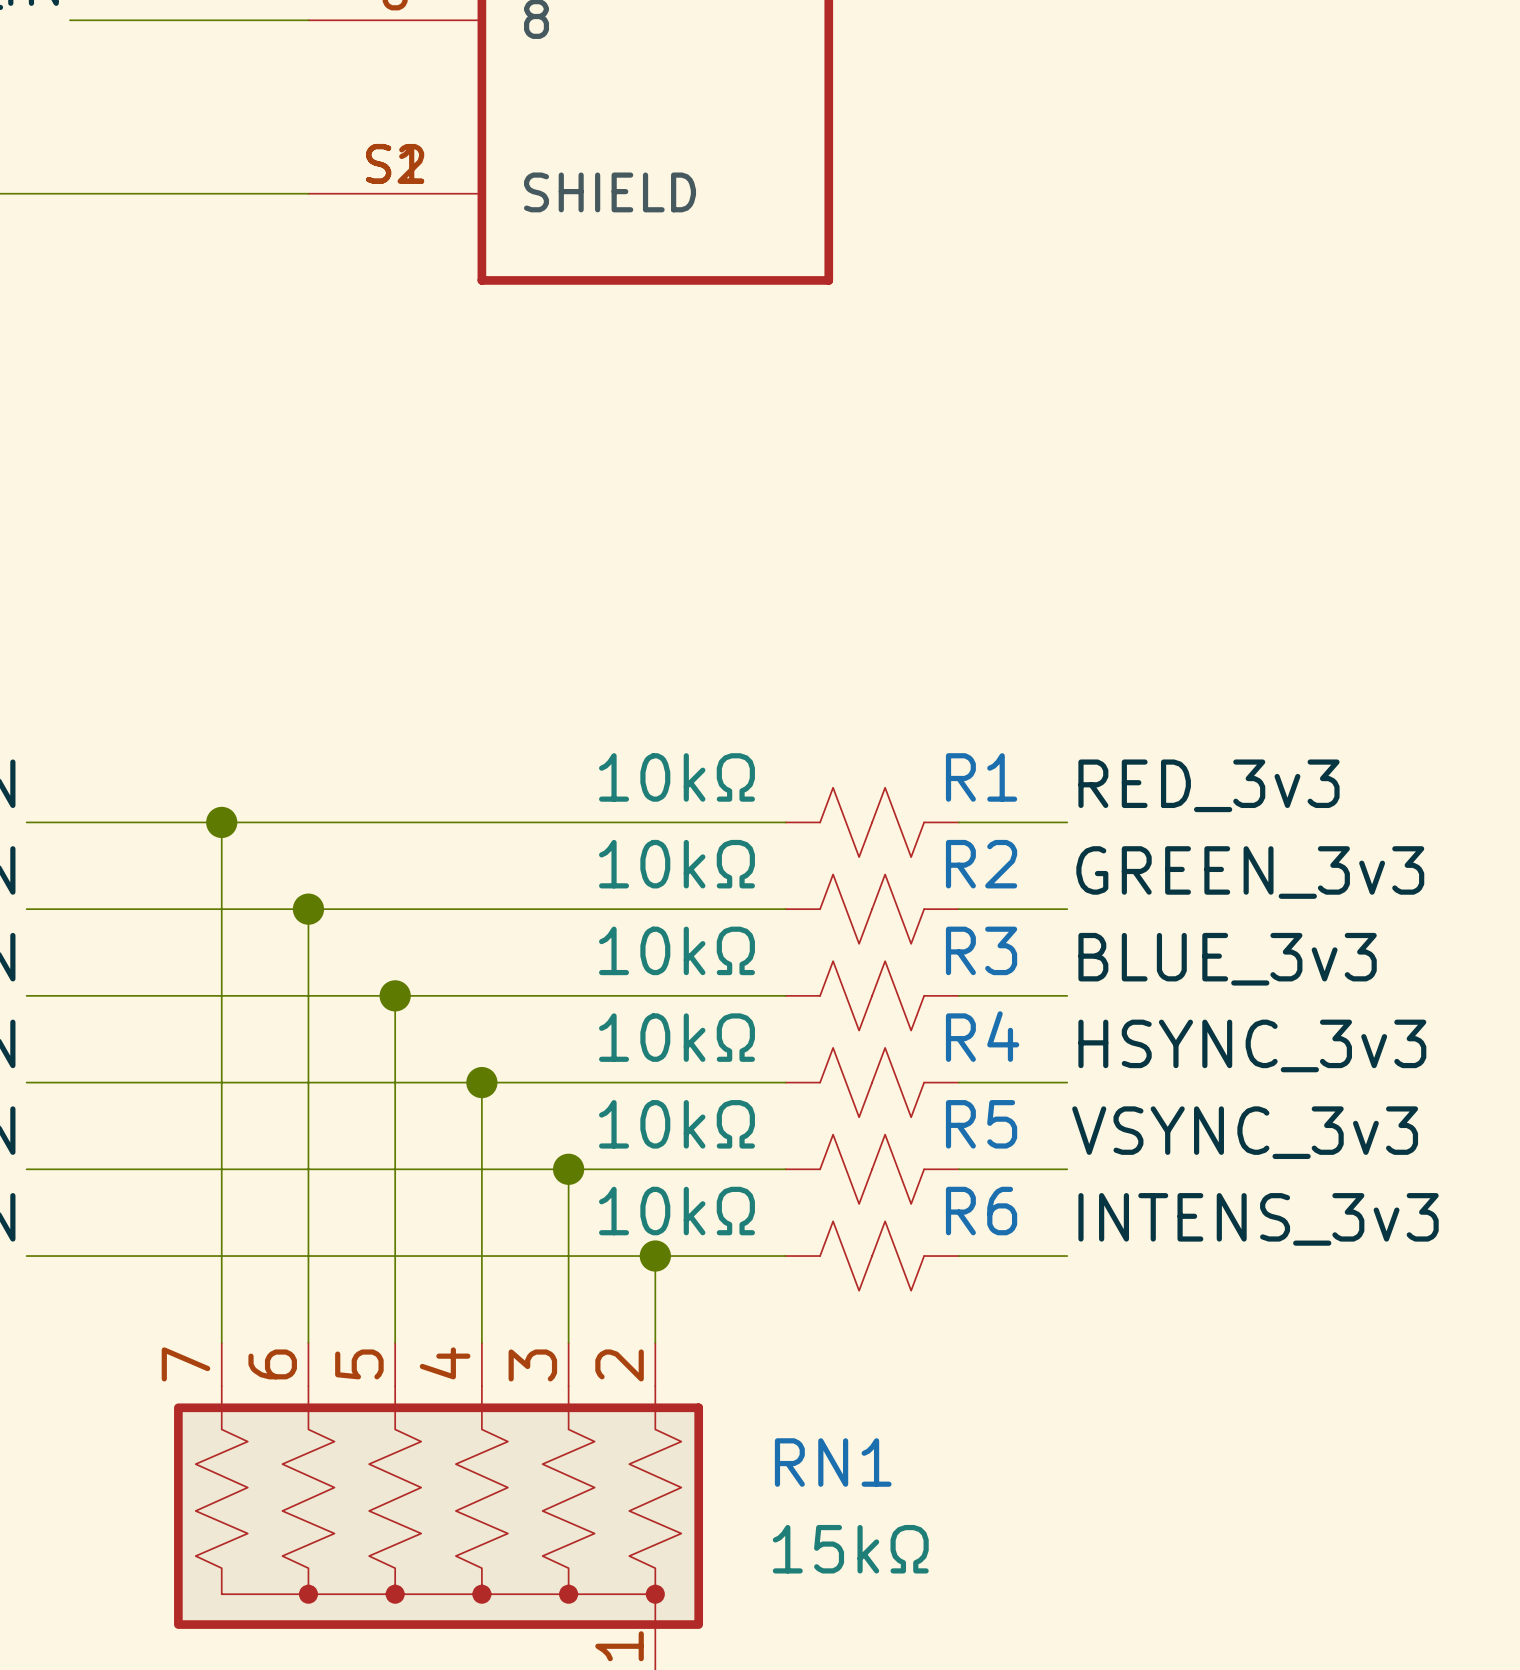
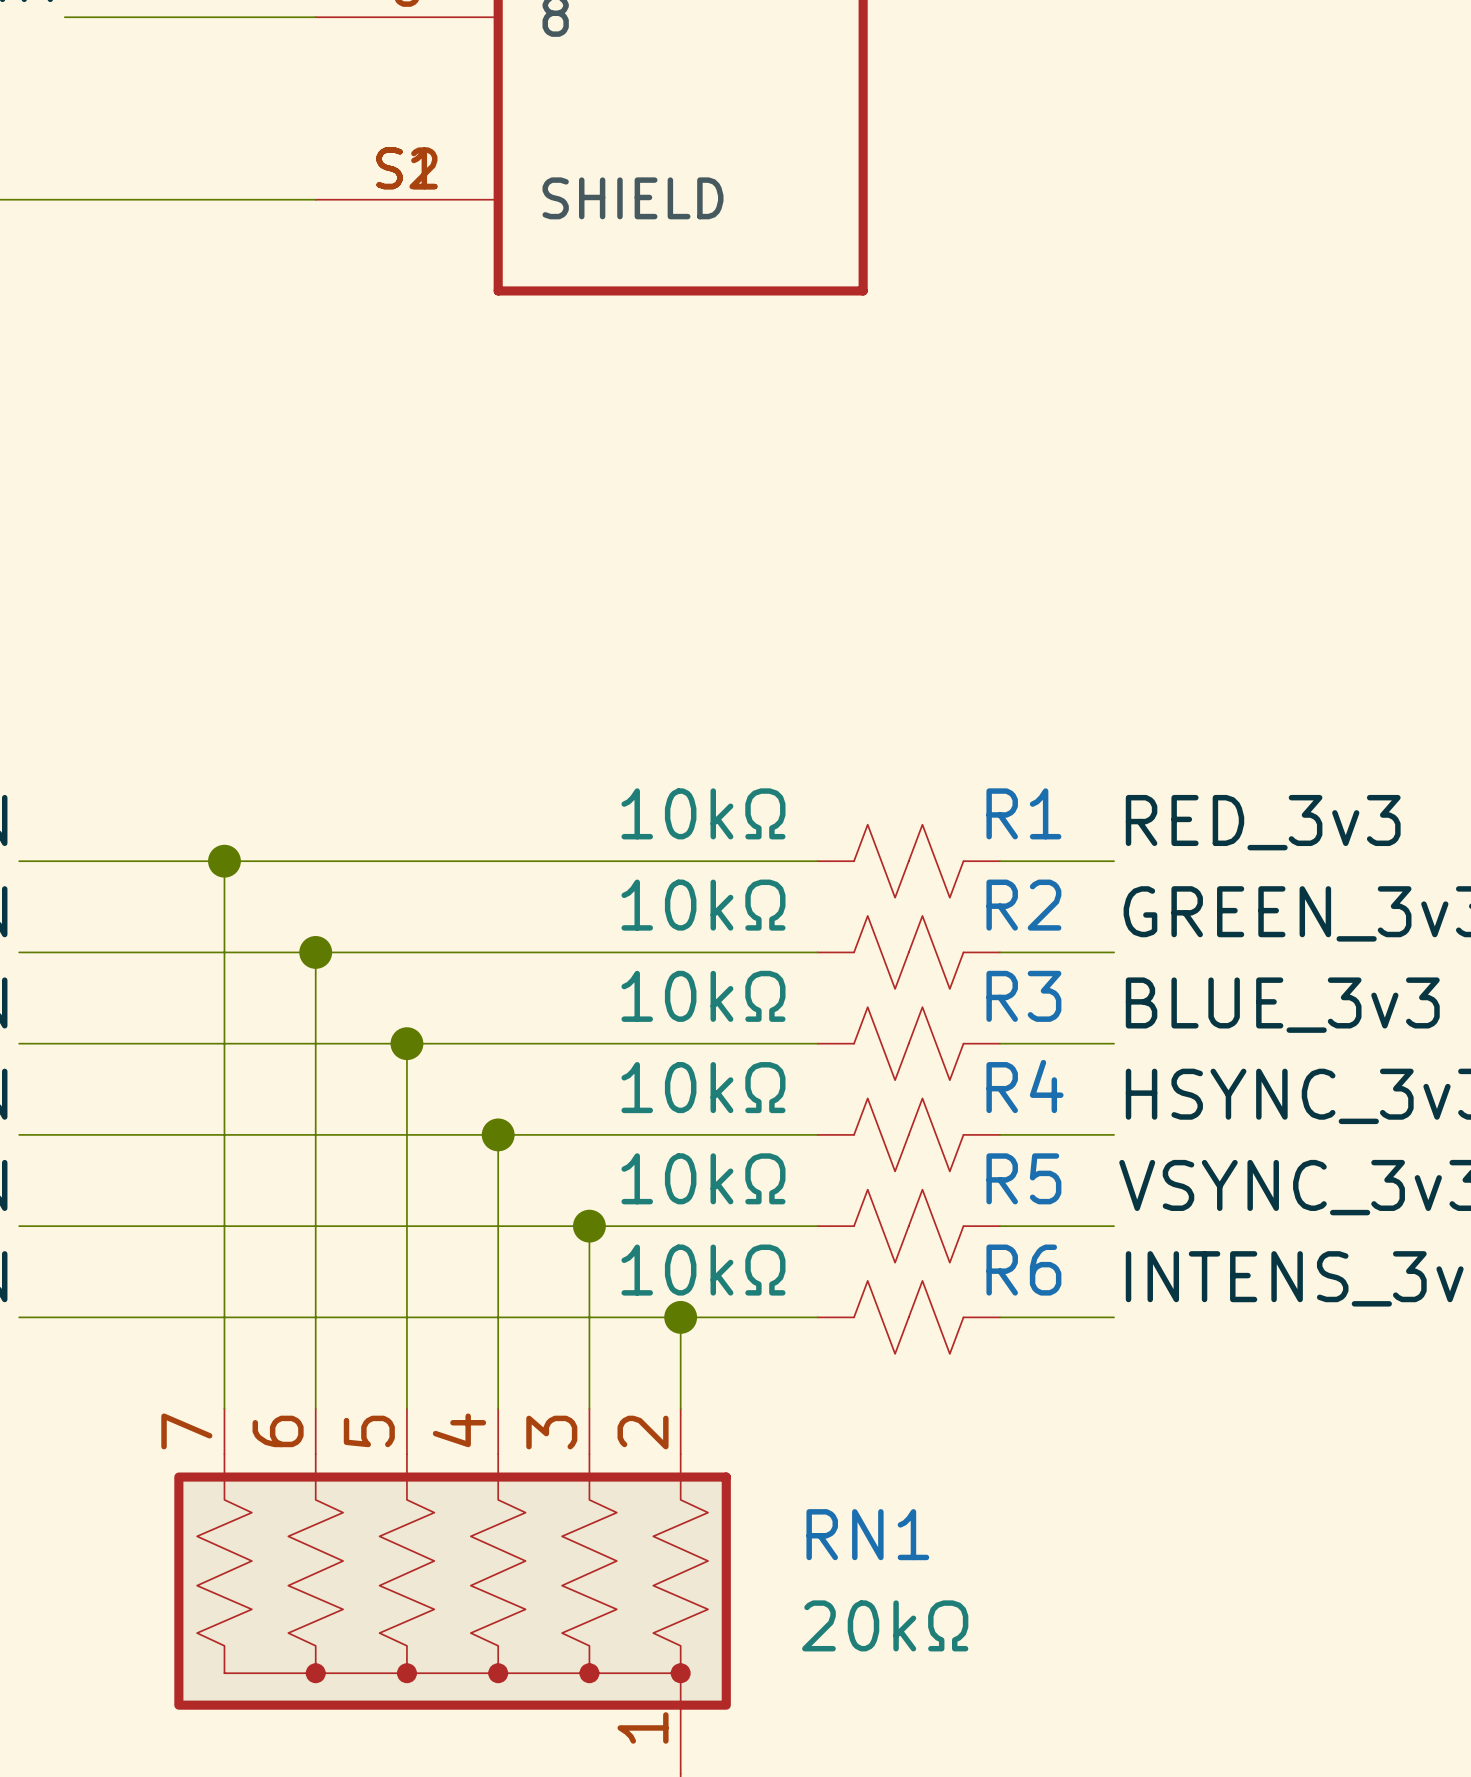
RN1 value: 15kΩ (850, 1549) -> 20kΩ (885, 1625)

